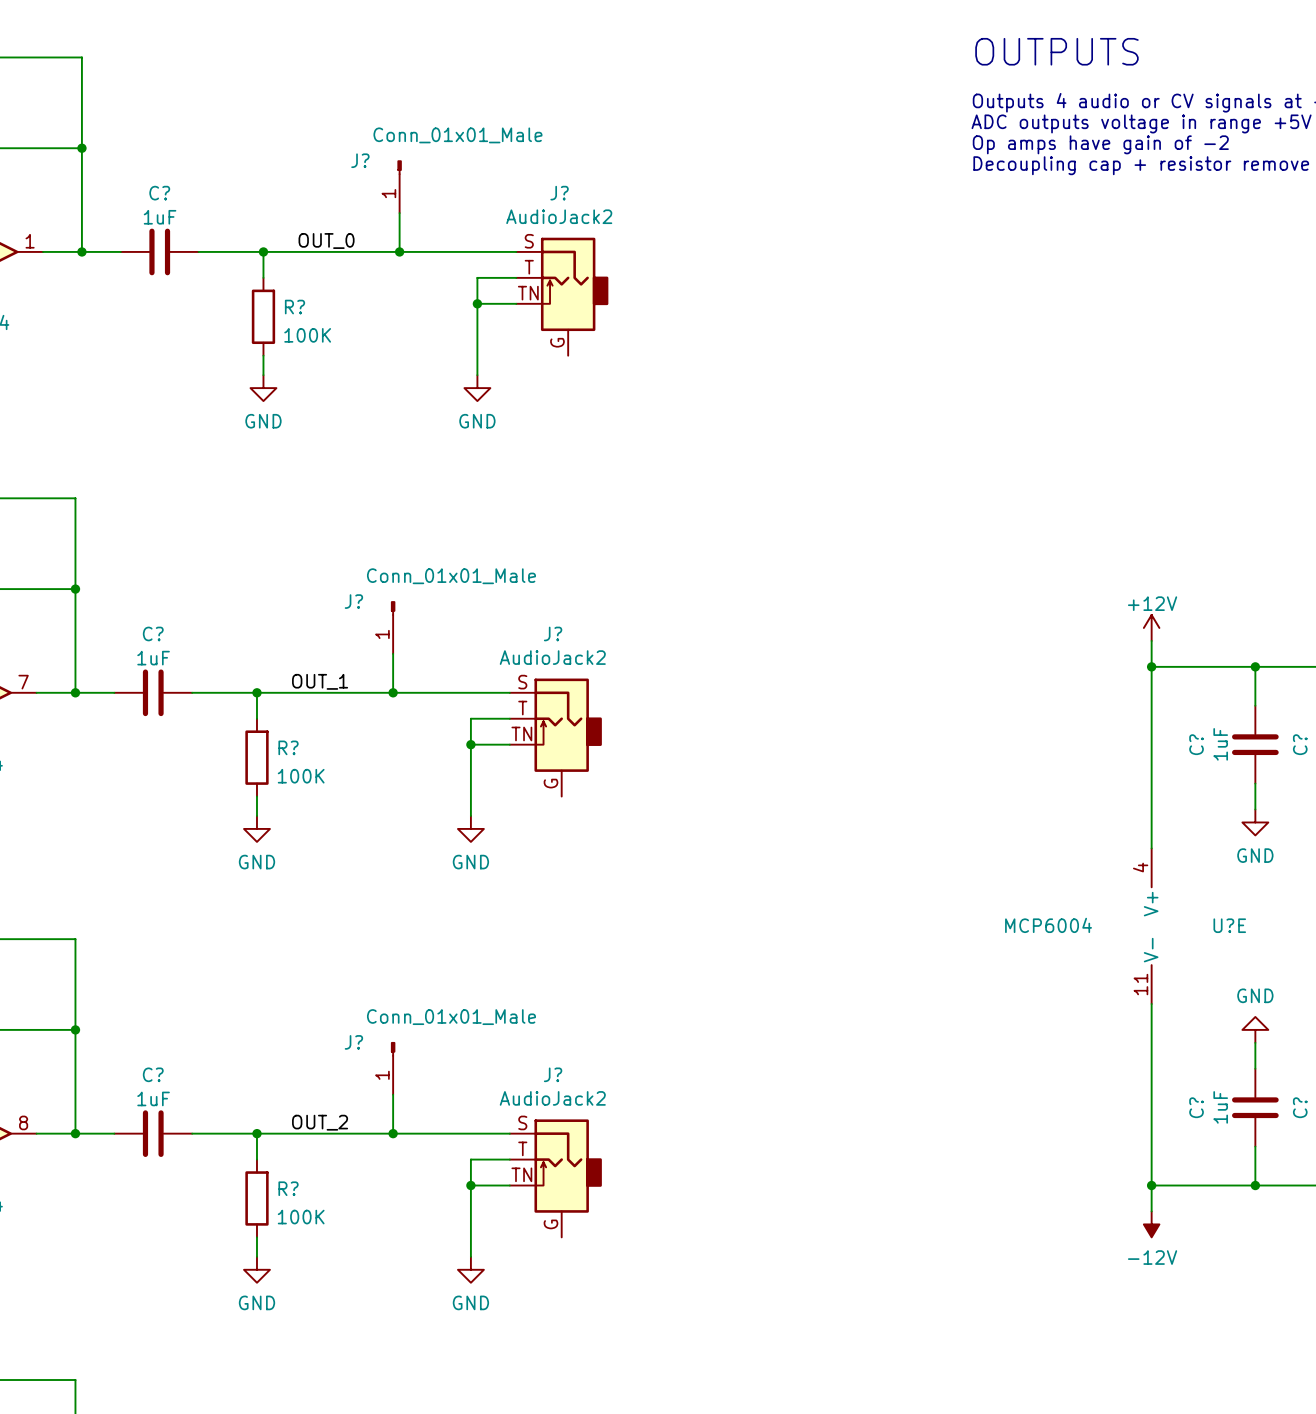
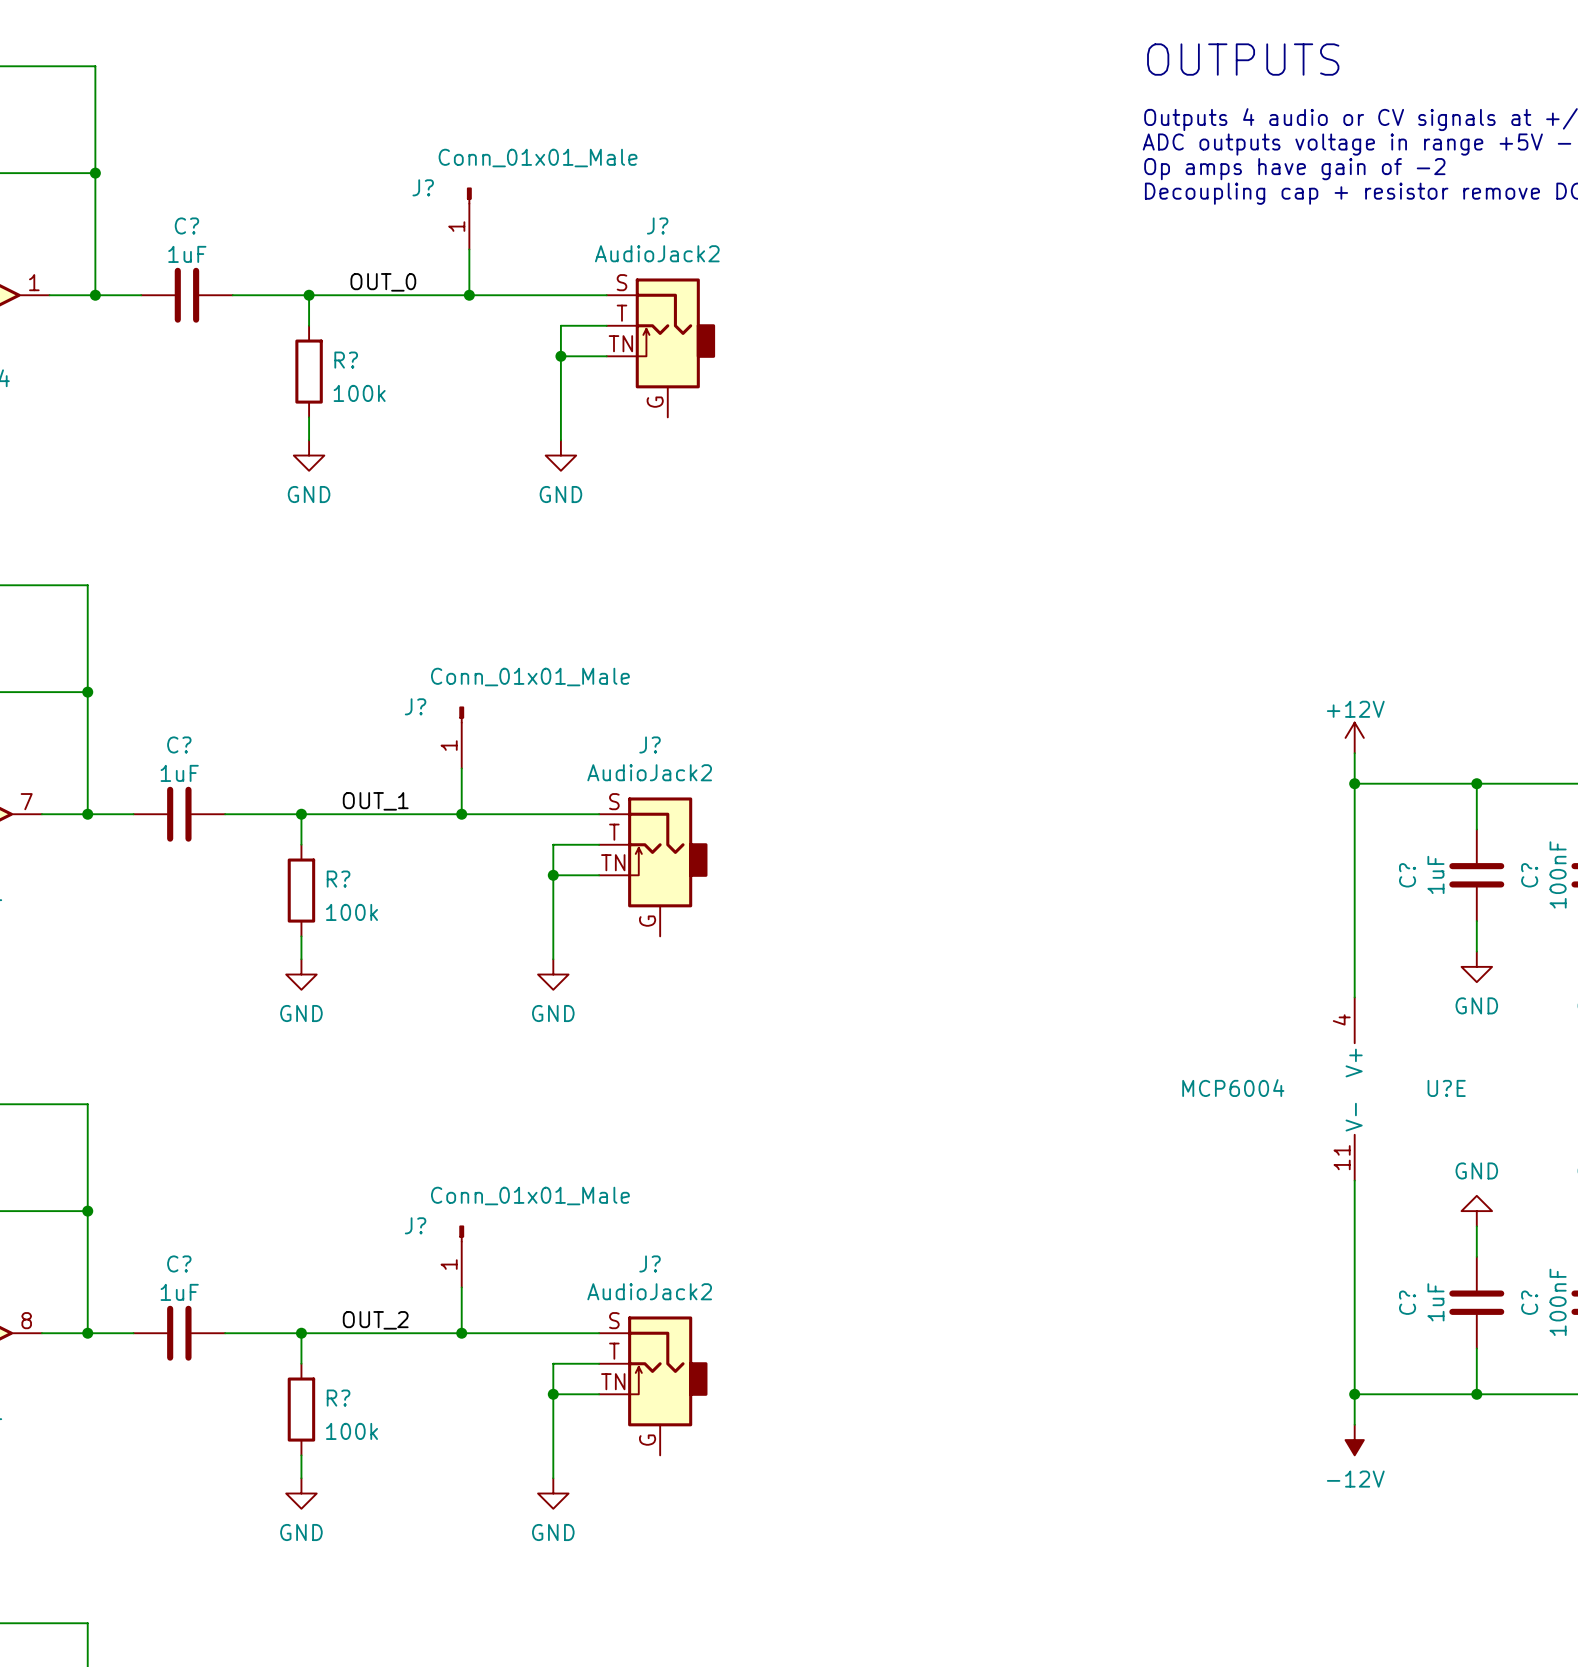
R? value: 100K (307, 335) -> 100k (359, 393)
R? value: 100K (301, 776) -> 100k (352, 912)
R? value: 100K (301, 1217) -> 100k (352, 1431)

